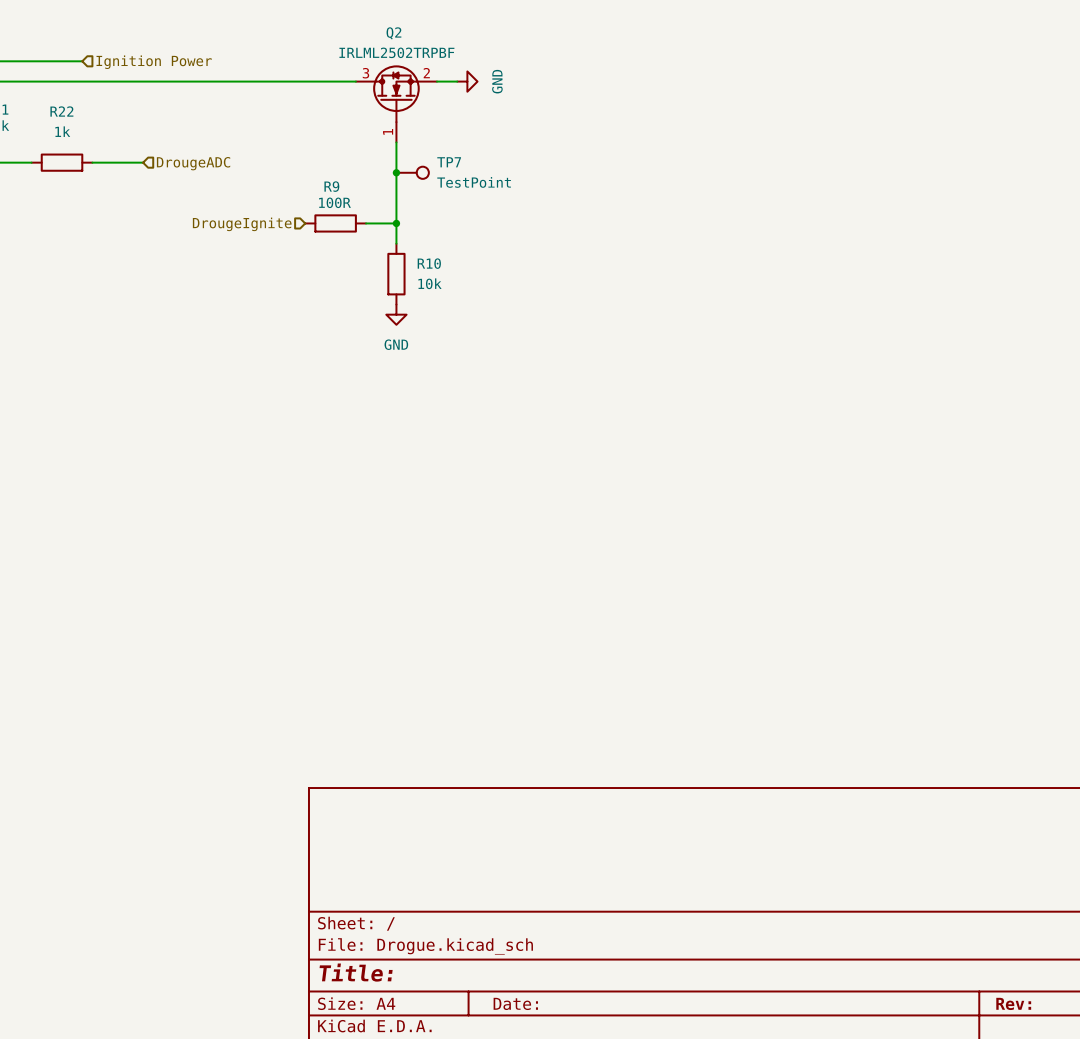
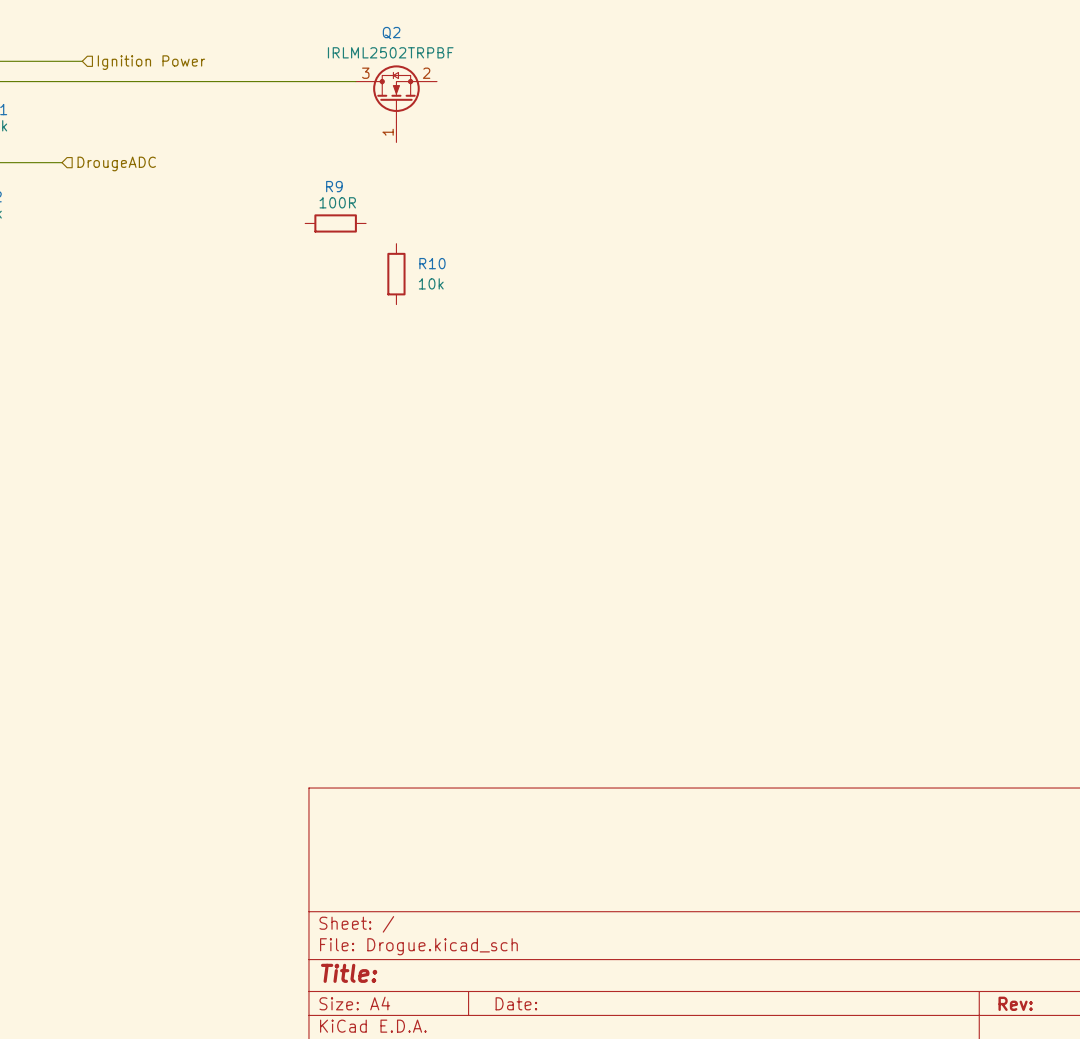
wire: (436, 81) (457, 81) -> none
power symbol: GND (467, 81) -> none
wire: (396, 142) (396, 243) -> none
wire: none -> (31, 162) (62, 162)
R22: 1k (62, 162) -> none
wire: (92, 162) (143, 162) -> none
hierarchical label position: DrougeADC (193, 163) -> DrougeADC (116, 163)
junction: (396, 172) -> none
TP7: TestPoint (412, 172) -> none
wire: (366, 223) (396, 223) -> none
junction: (396, 223) -> none
hierarchical label: DrougeIgnite (242, 224) -> none
power symbol: GND (396, 314) -> none

